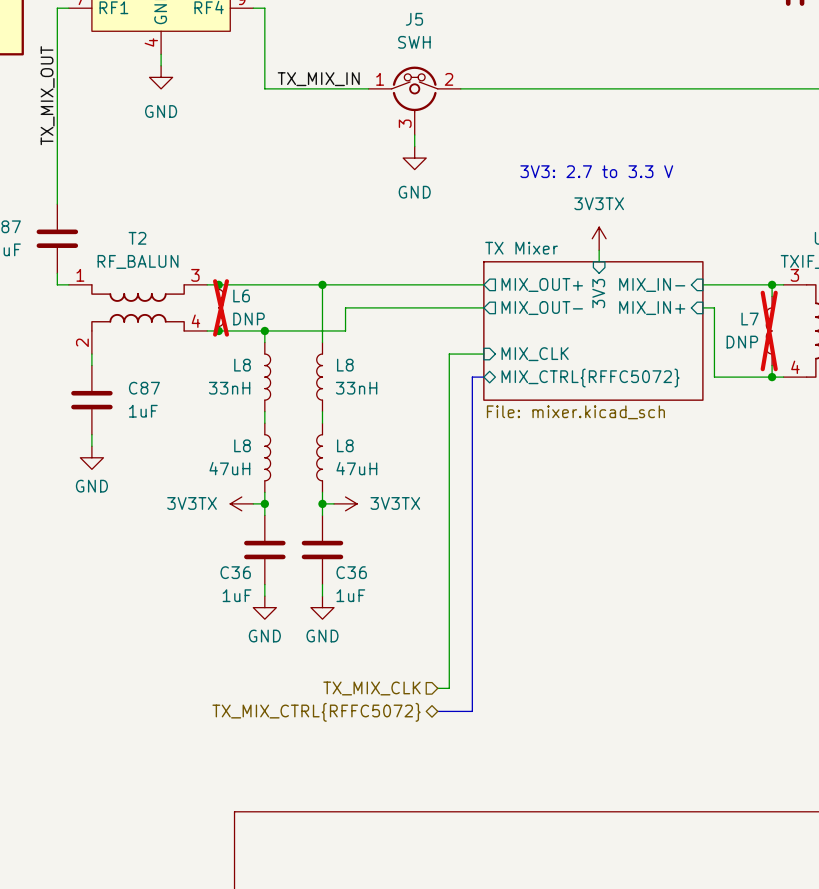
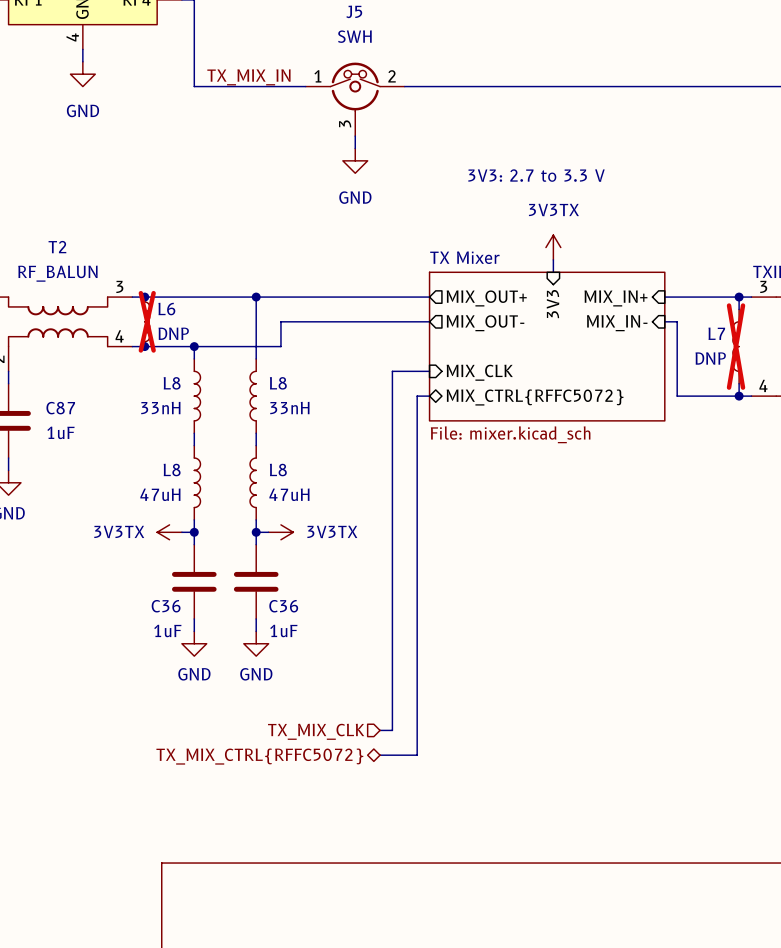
sheet pin: MIX_IN- (652, 284) -> MIX_IN+ (615, 298)
sheet pin: MIX_IN+ (652, 308) -> MIX_IN- (617, 323)

